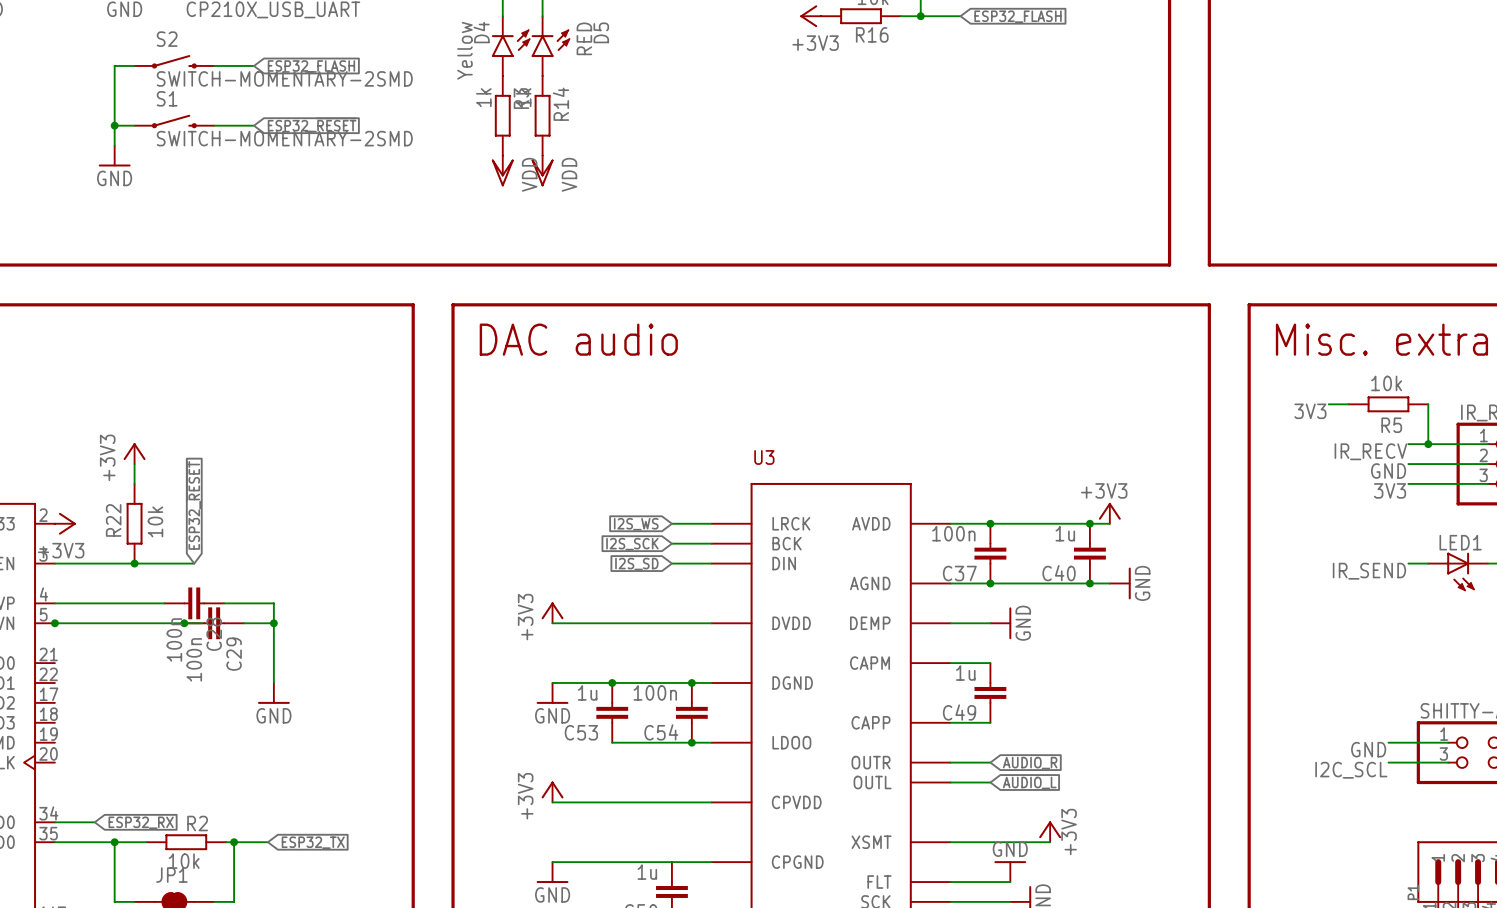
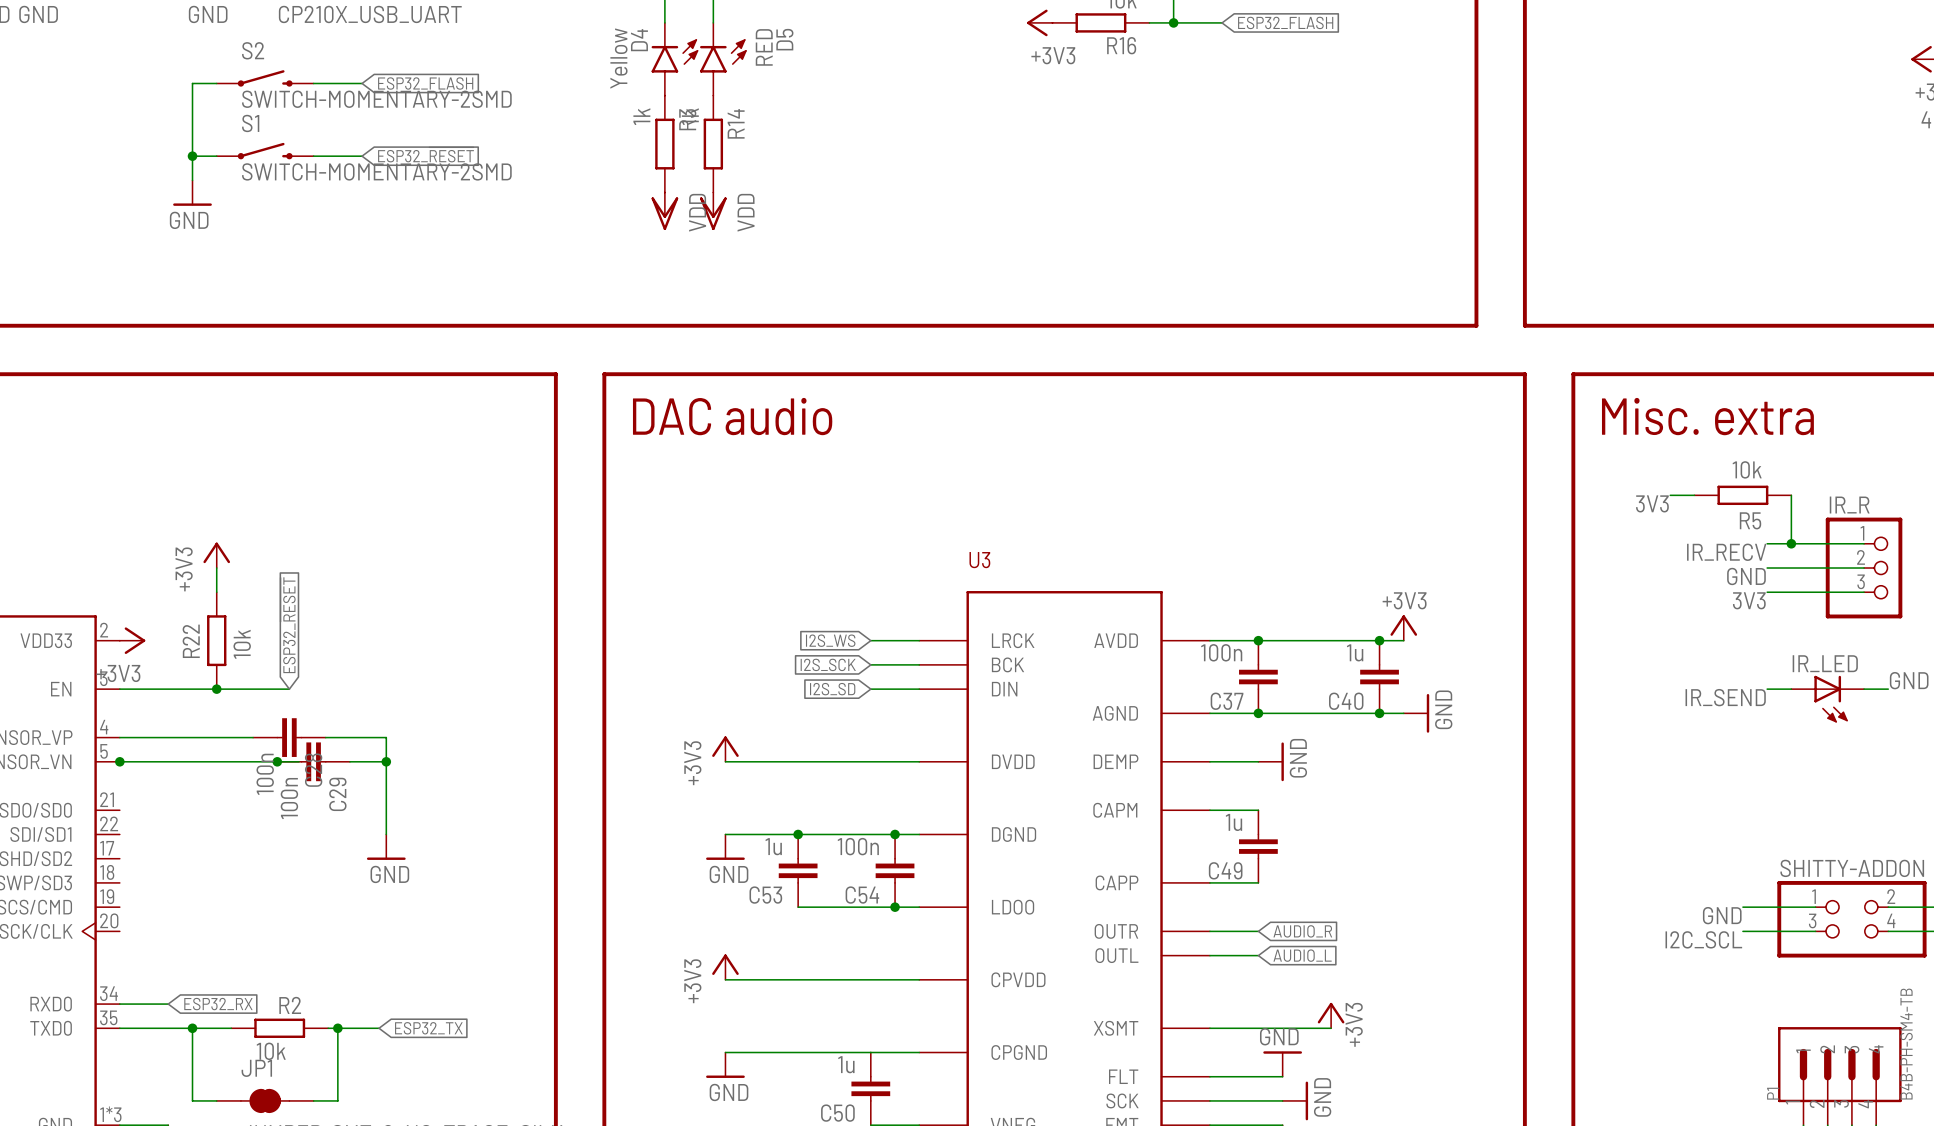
LED1 name: LED1 (1460, 542) -> IR_LED (1825, 663)

